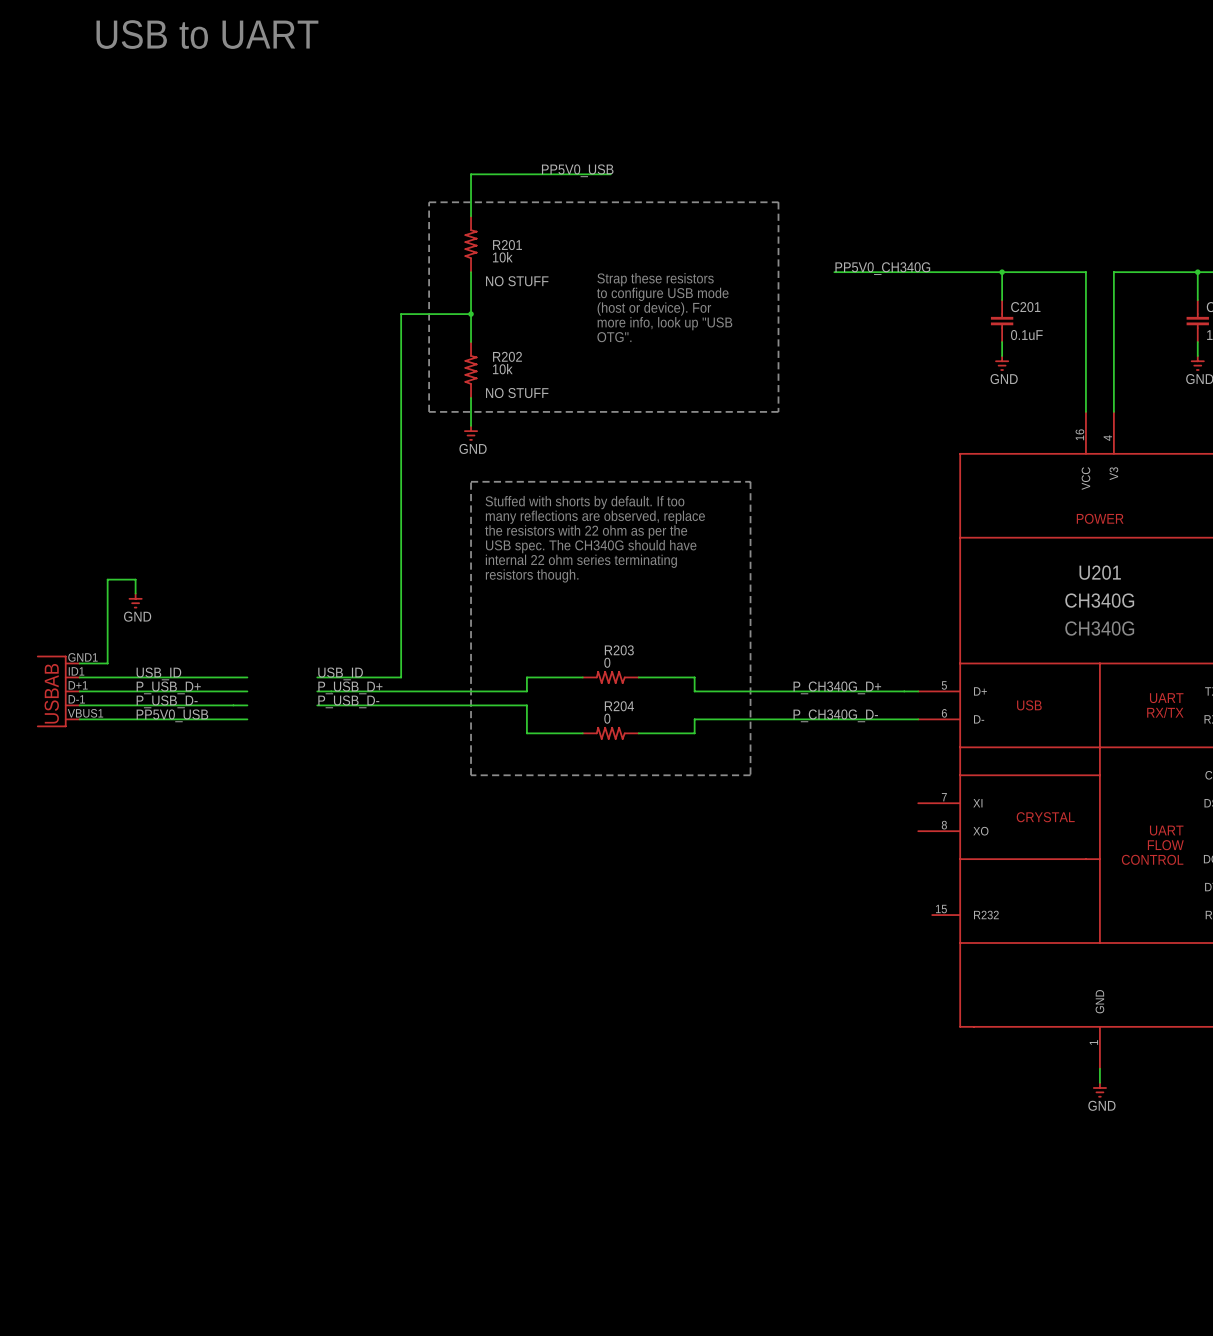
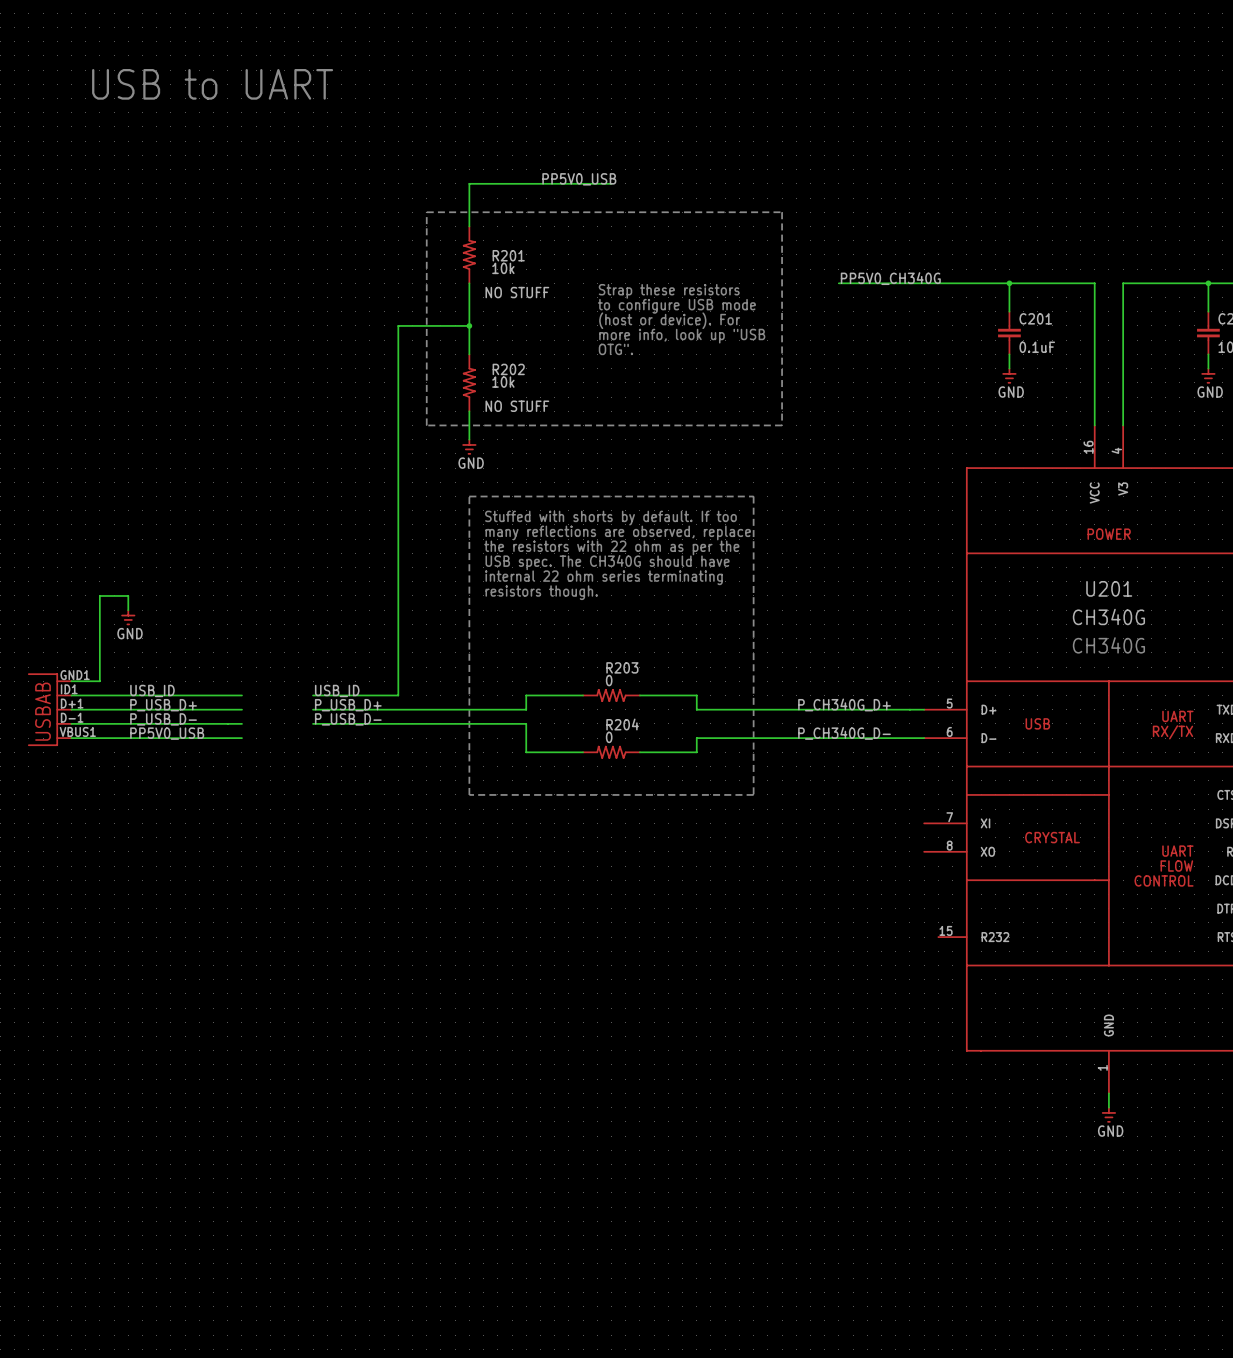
text position: USB to UART (207, 34) -> USB to UART (212, 84)

